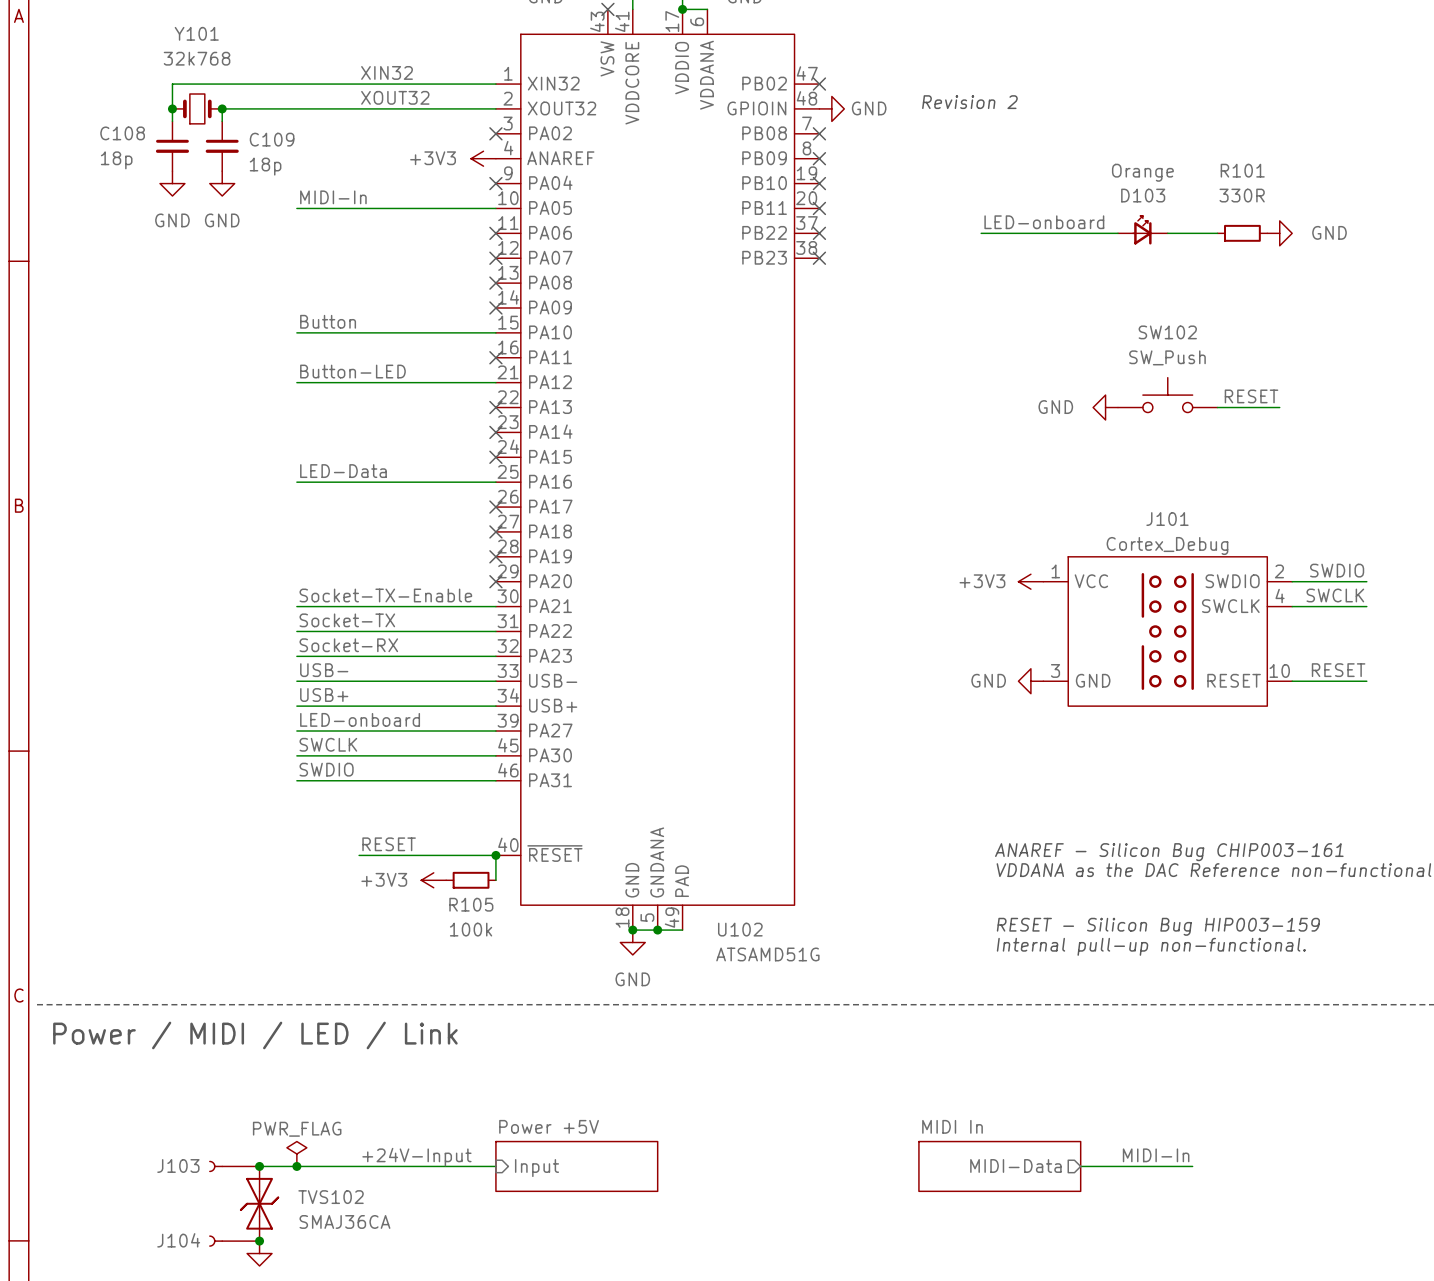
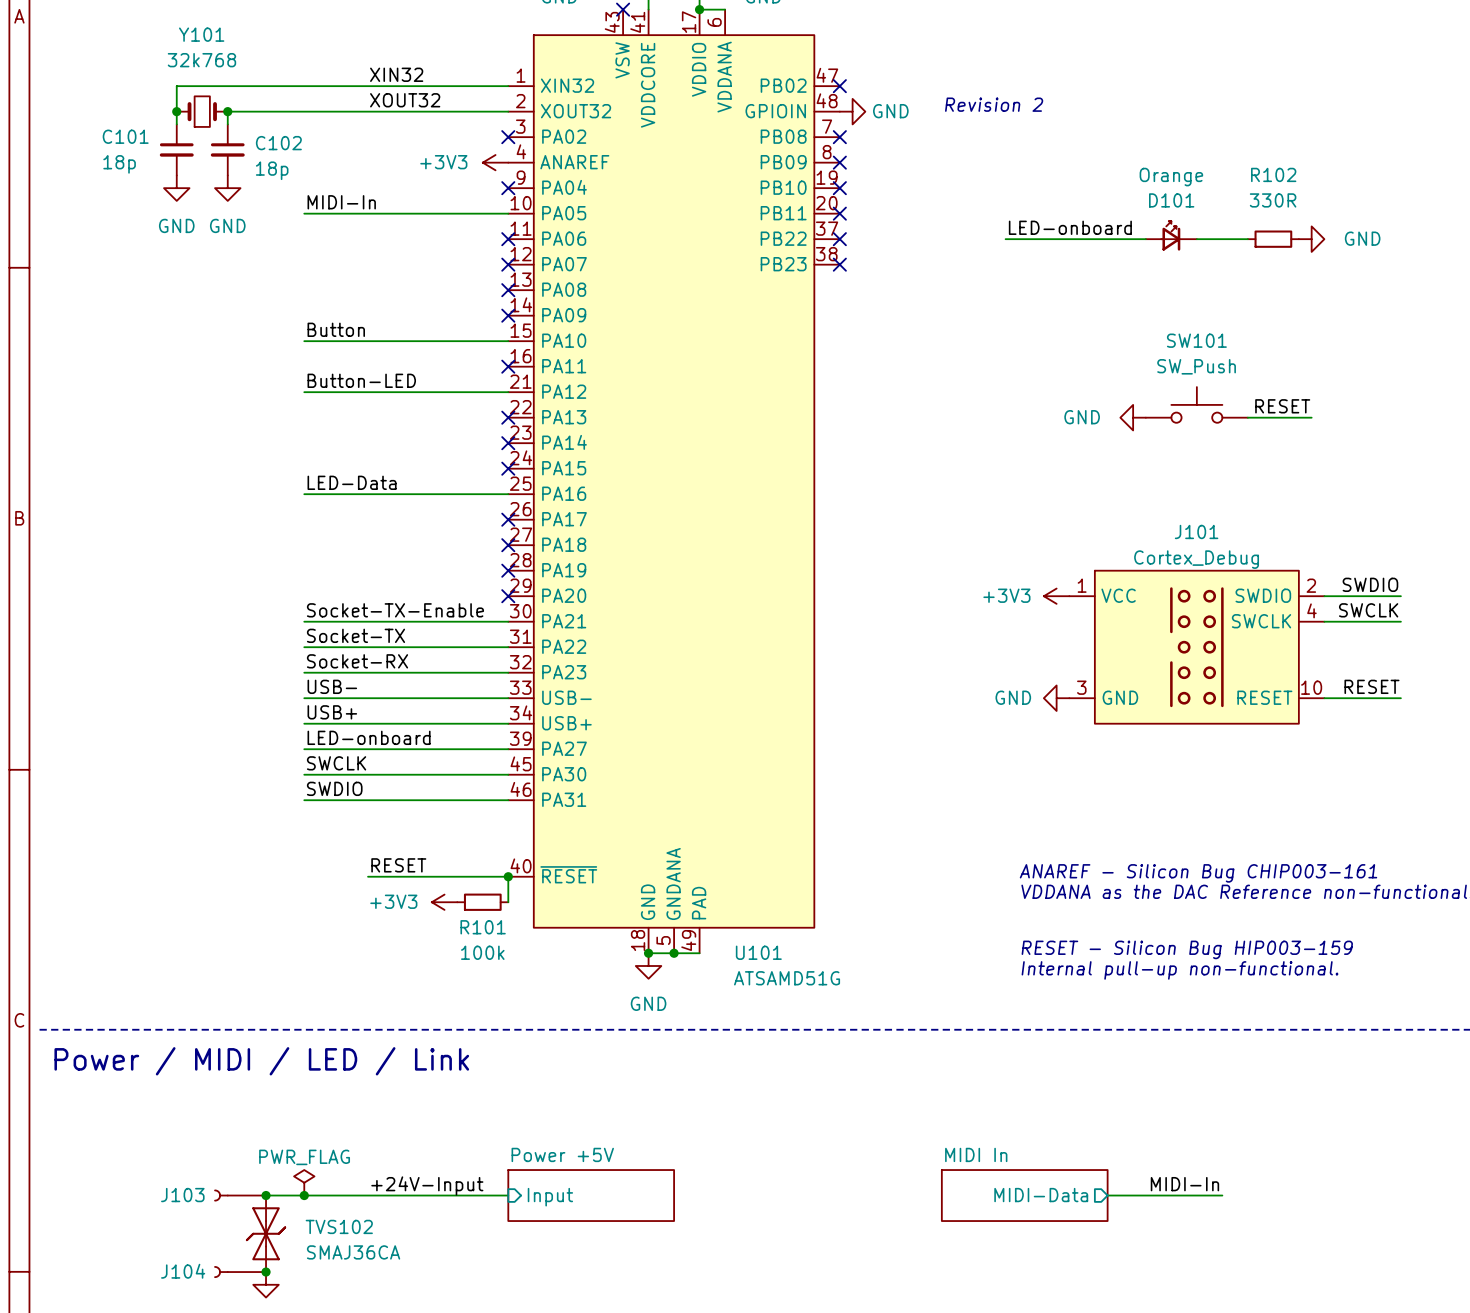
C108 name: C108 (122, 133) -> C101 (125, 136)
C109 name: C109 (272, 139) -> C102 (278, 143)
R101 name: R101 (1242, 170) -> R102 (1273, 174)
D103 name: D103 (1143, 195) -> D101 (1171, 200)
SW102 name: SW102 (1167, 332) -> SW101 (1196, 340)
R105 name: R105 (471, 904) -> R101 (483, 927)
U102 name: U102 (740, 929) -> U101 (758, 952)

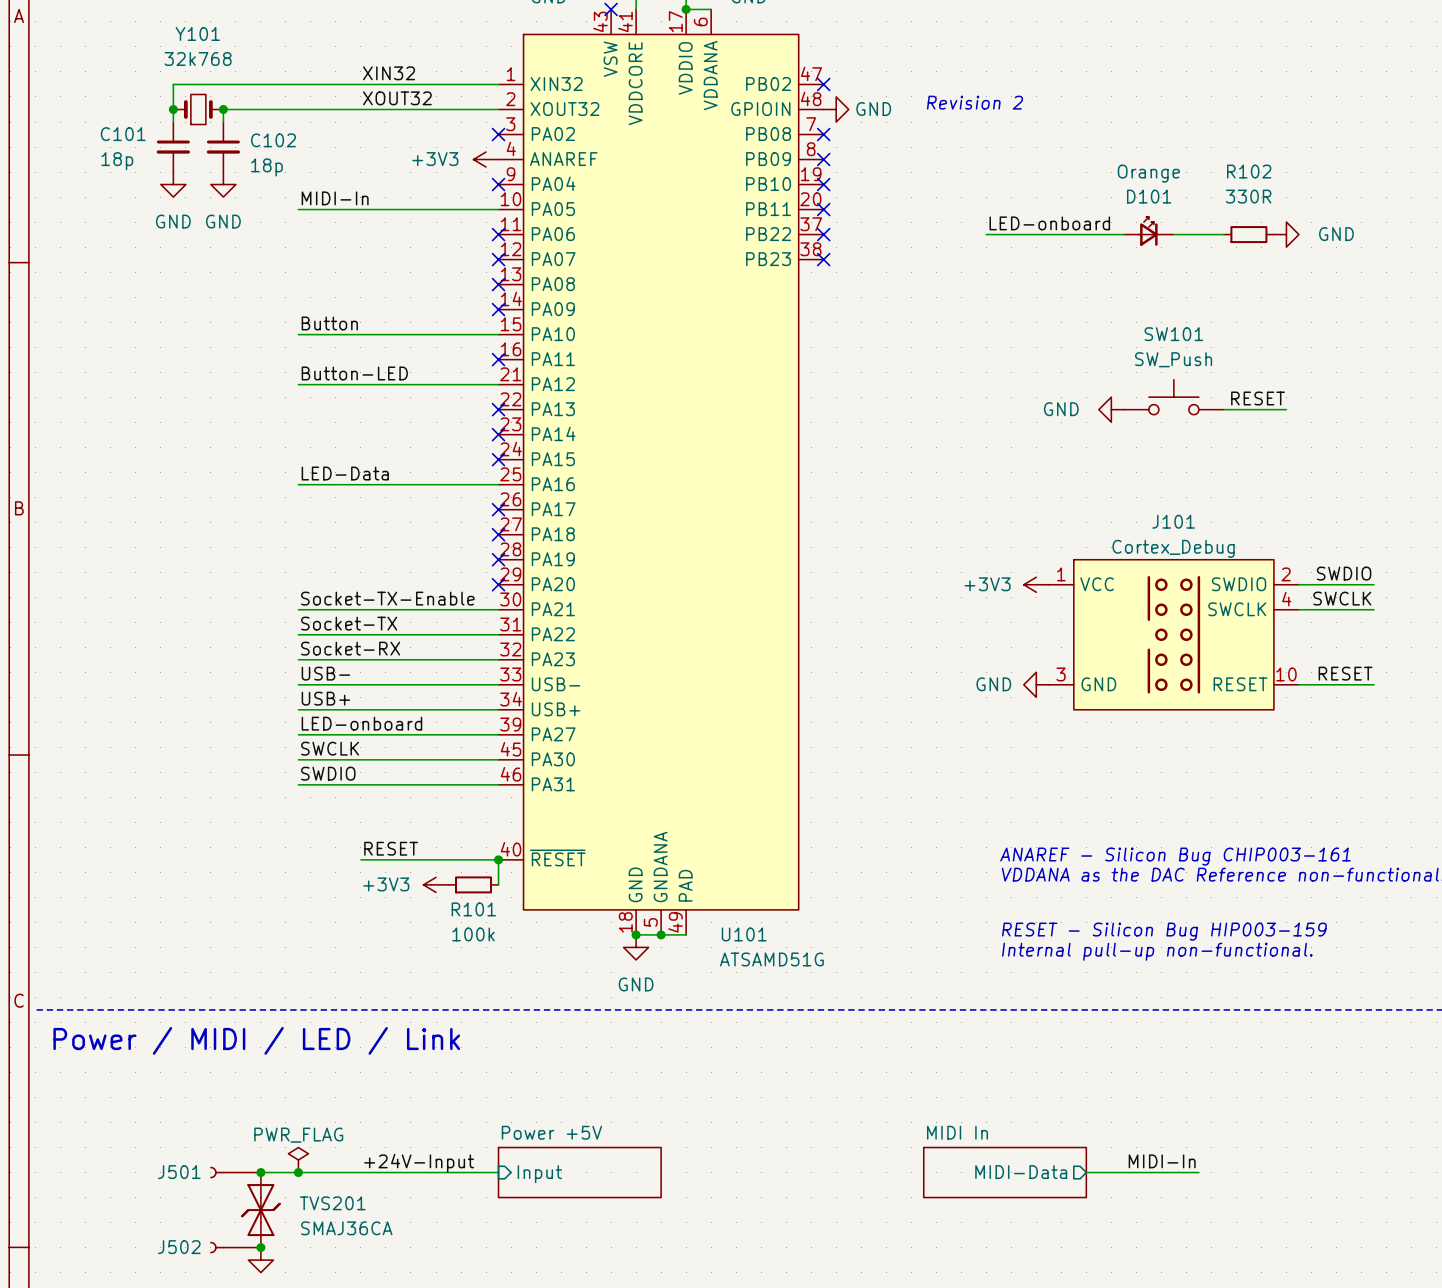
J103 name: J103 (182, 1195) -> J501 (179, 1172)
TVS102 name: TVS102 (339, 1226) -> TVS201 (332, 1203)
J104 name: J104 (183, 1271) -> J502 (179, 1247)

